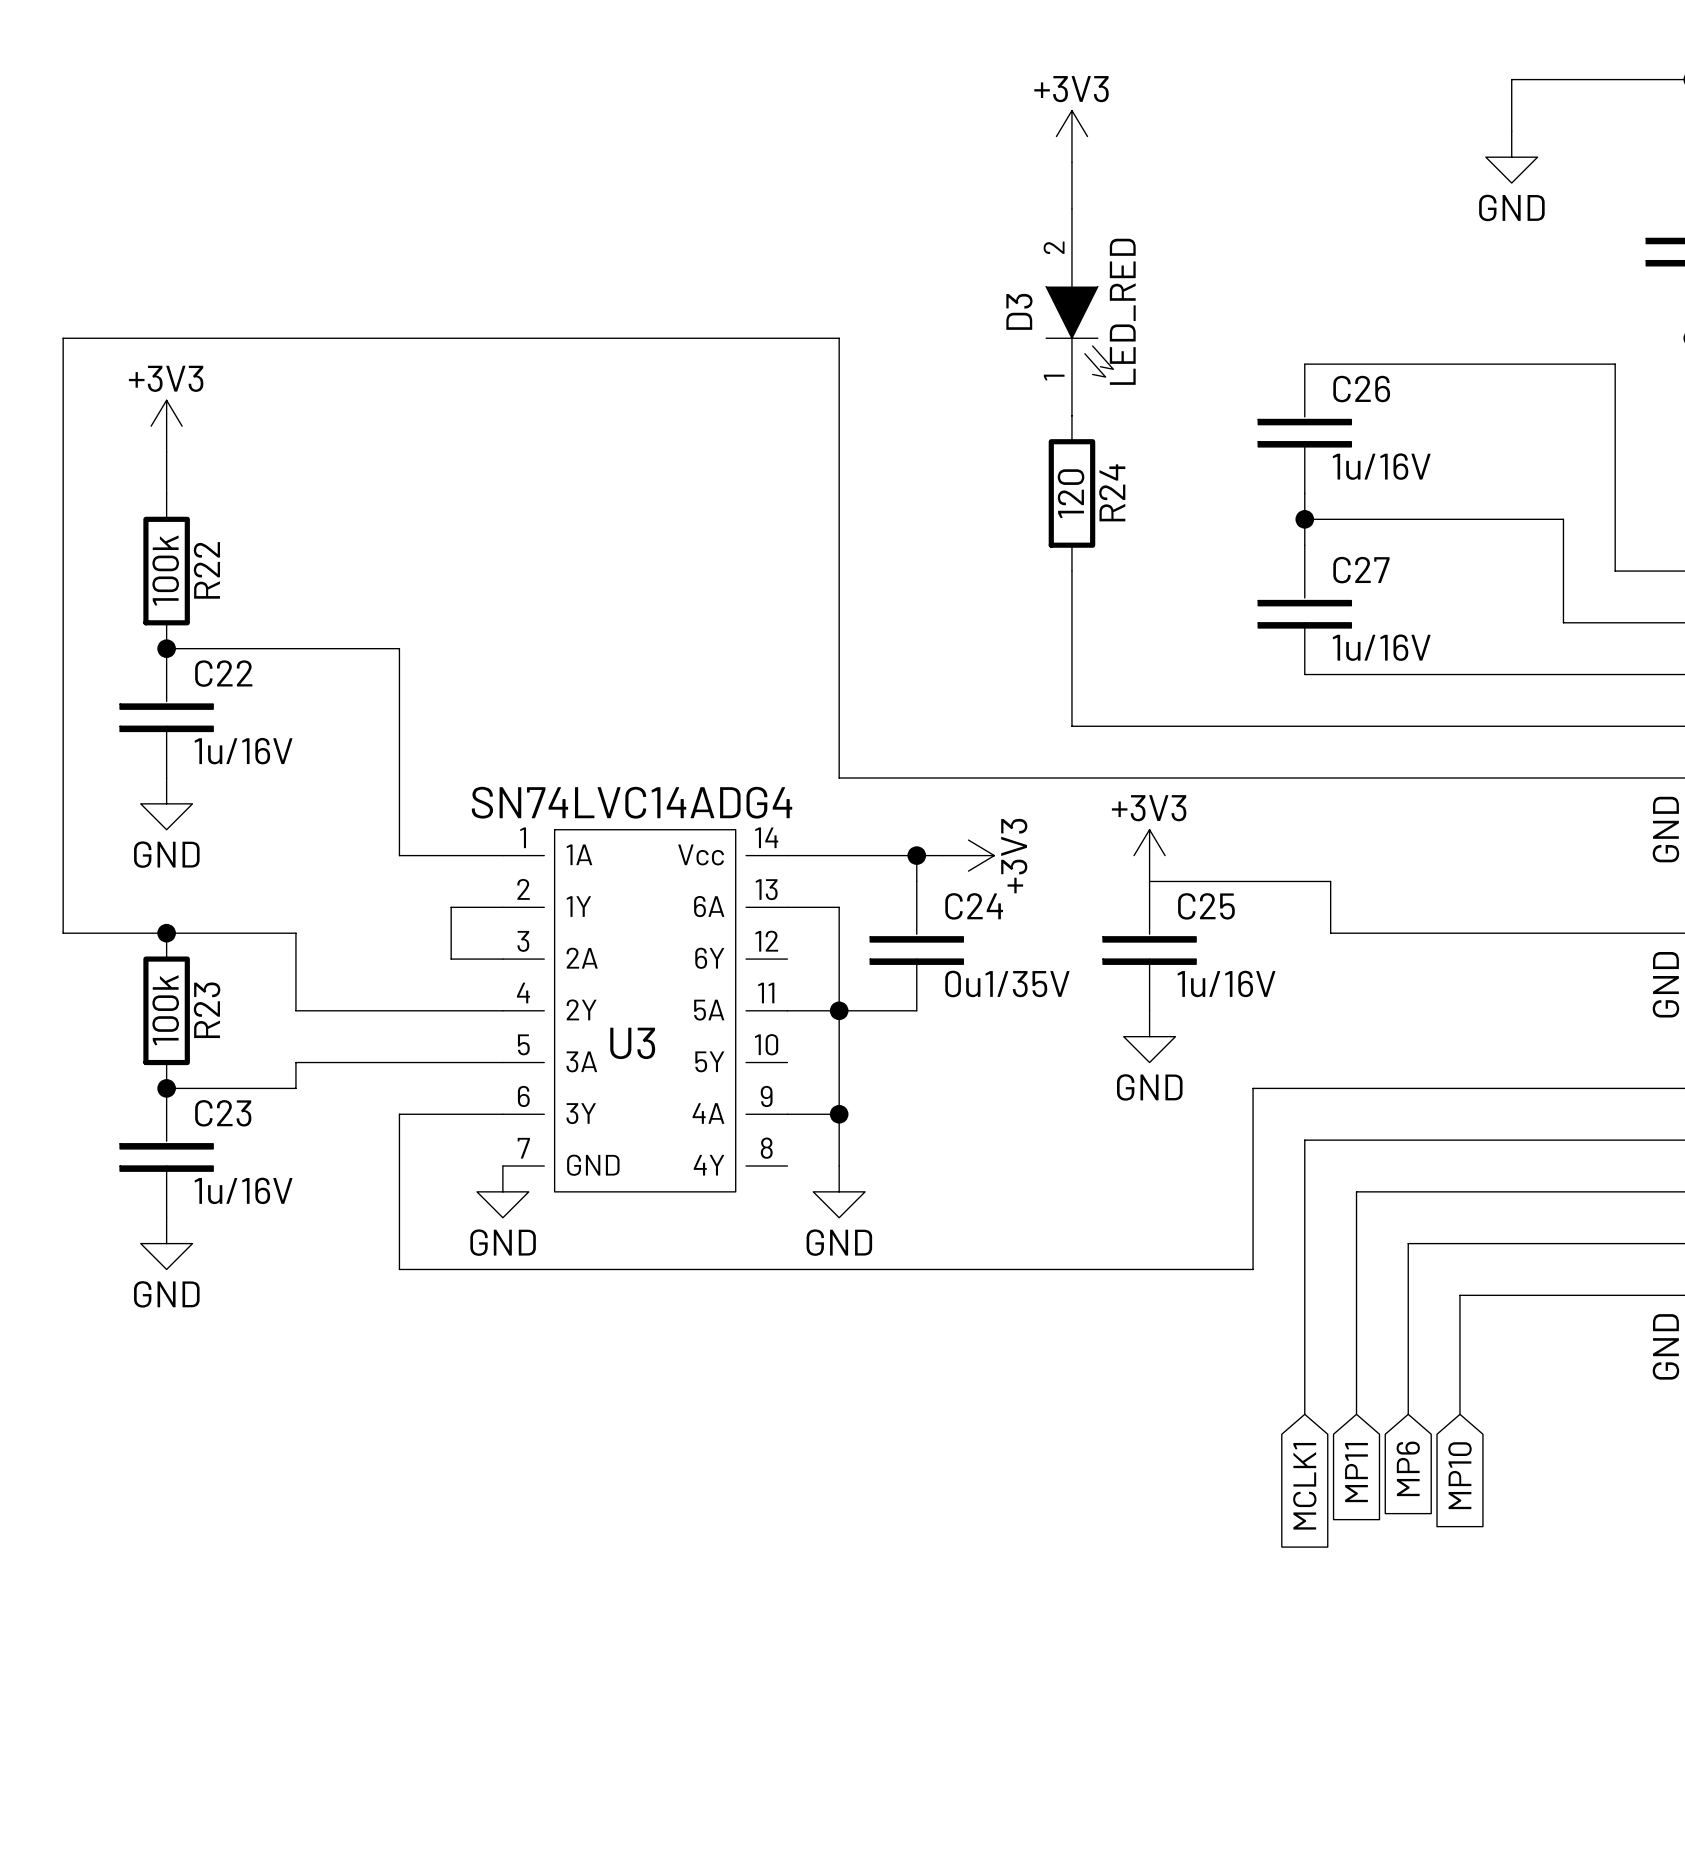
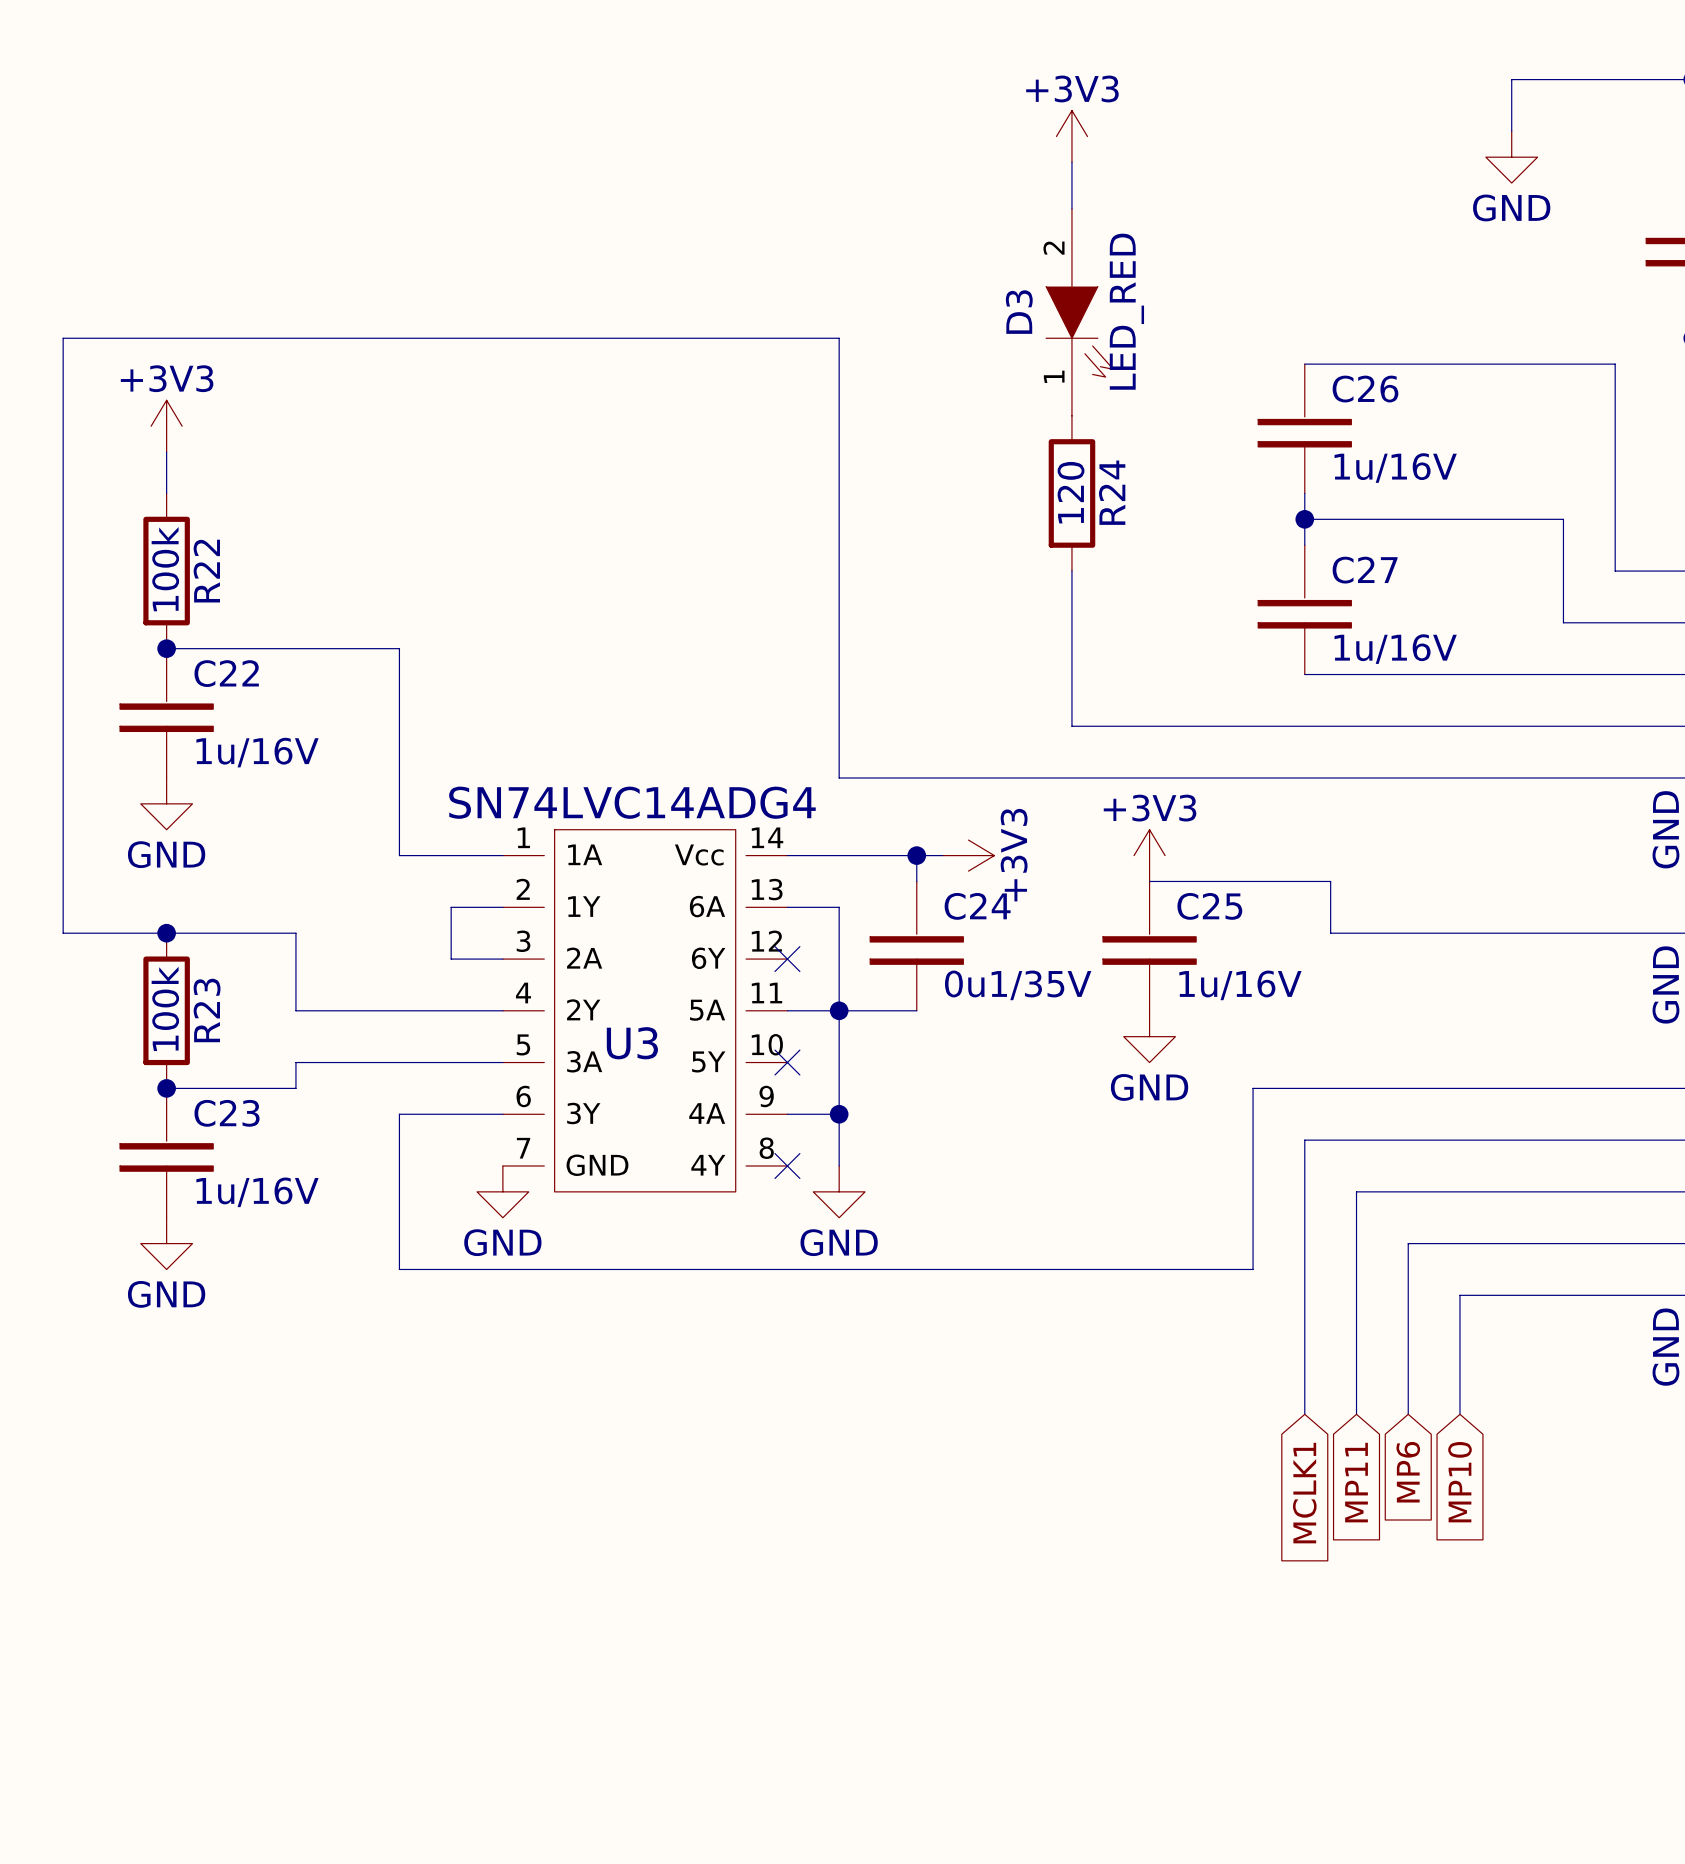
no-connect mark: none -> (787, 959)
no-connect mark: none -> (787, 1062)
no-connect mark: none -> (787, 1166)

